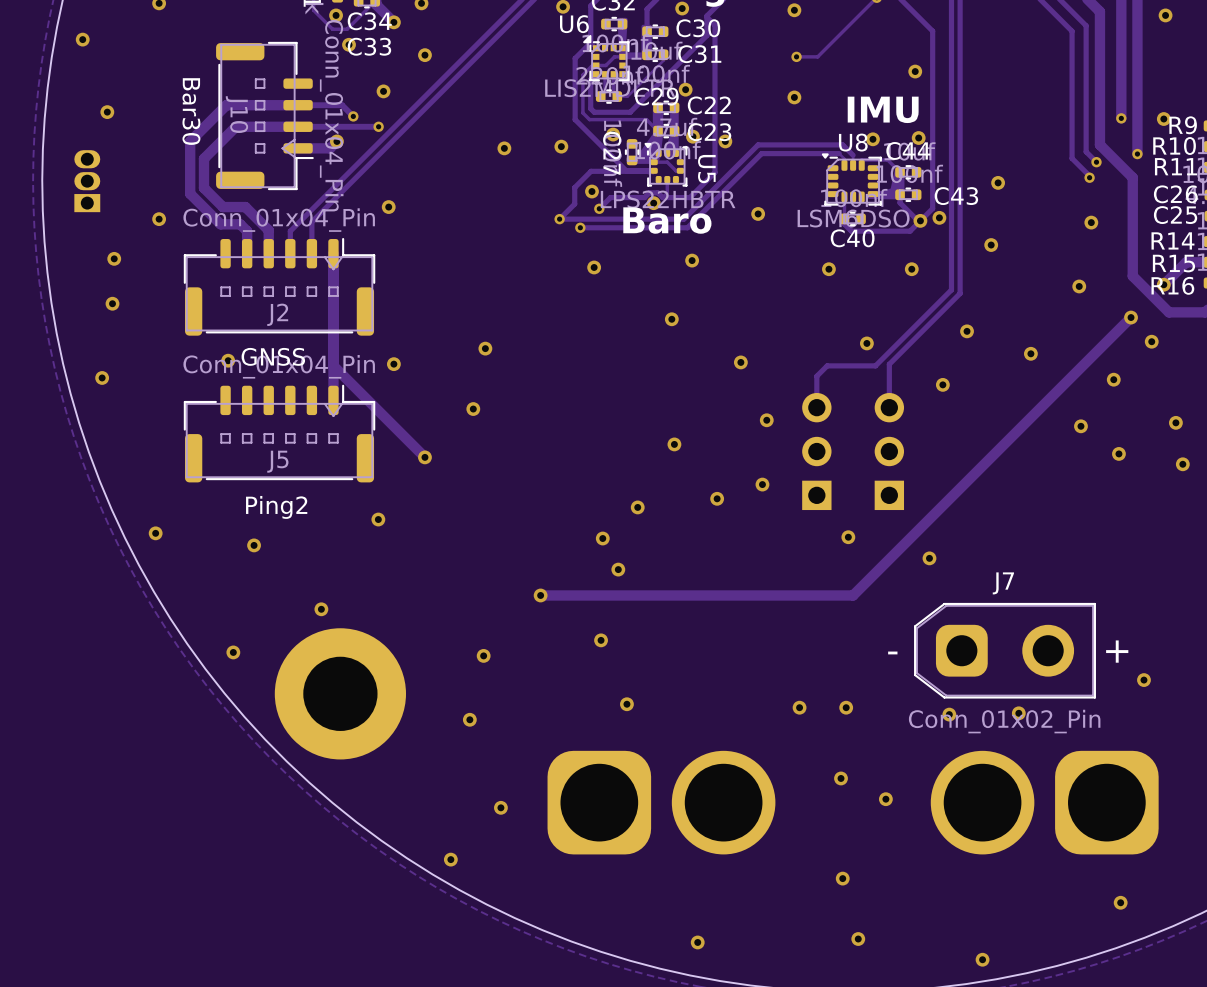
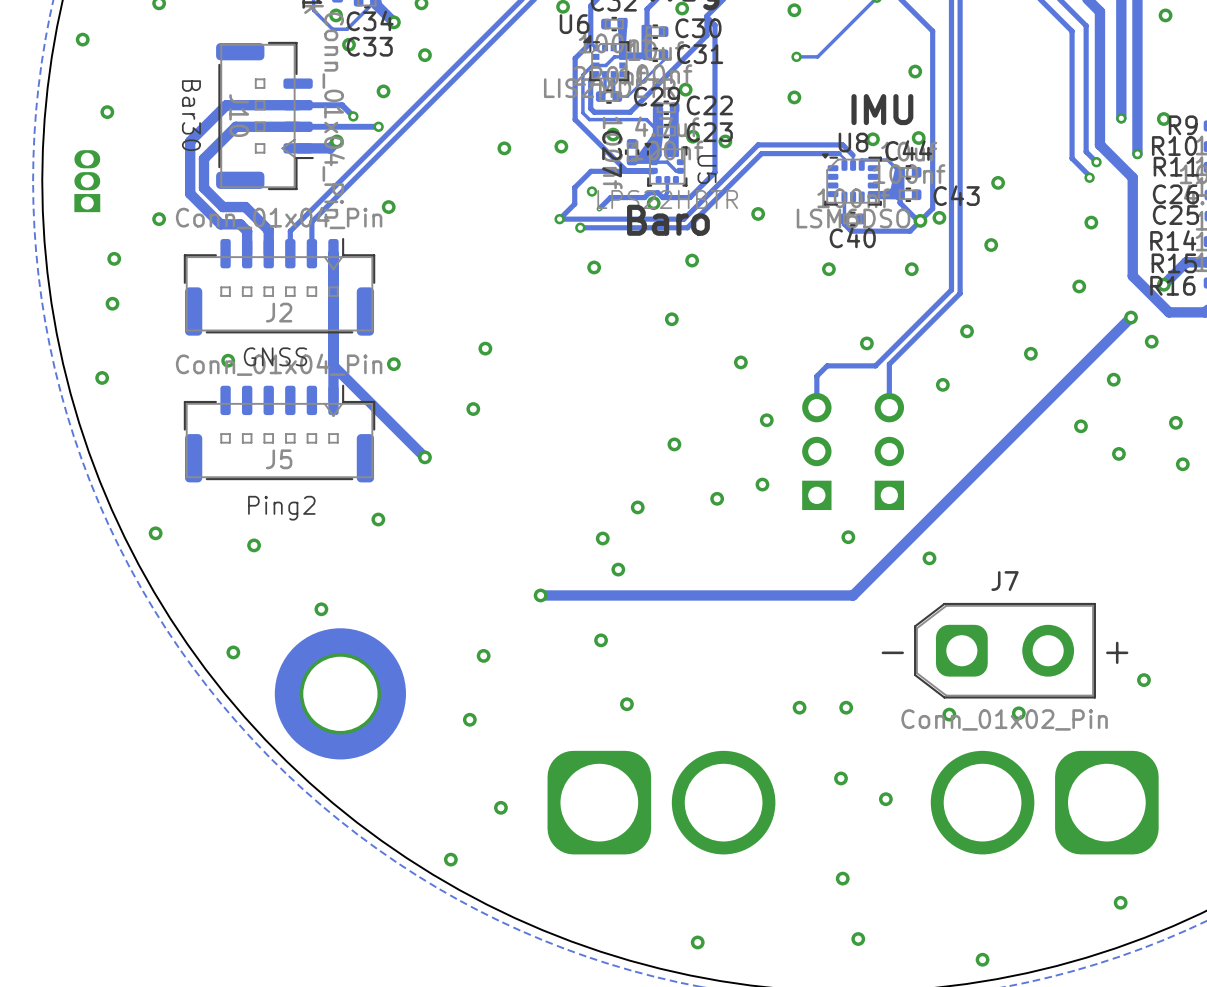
via: (591, 191) -> none
via position: (599, 208) -> (591, 191)
via: none -> (599, 208)

